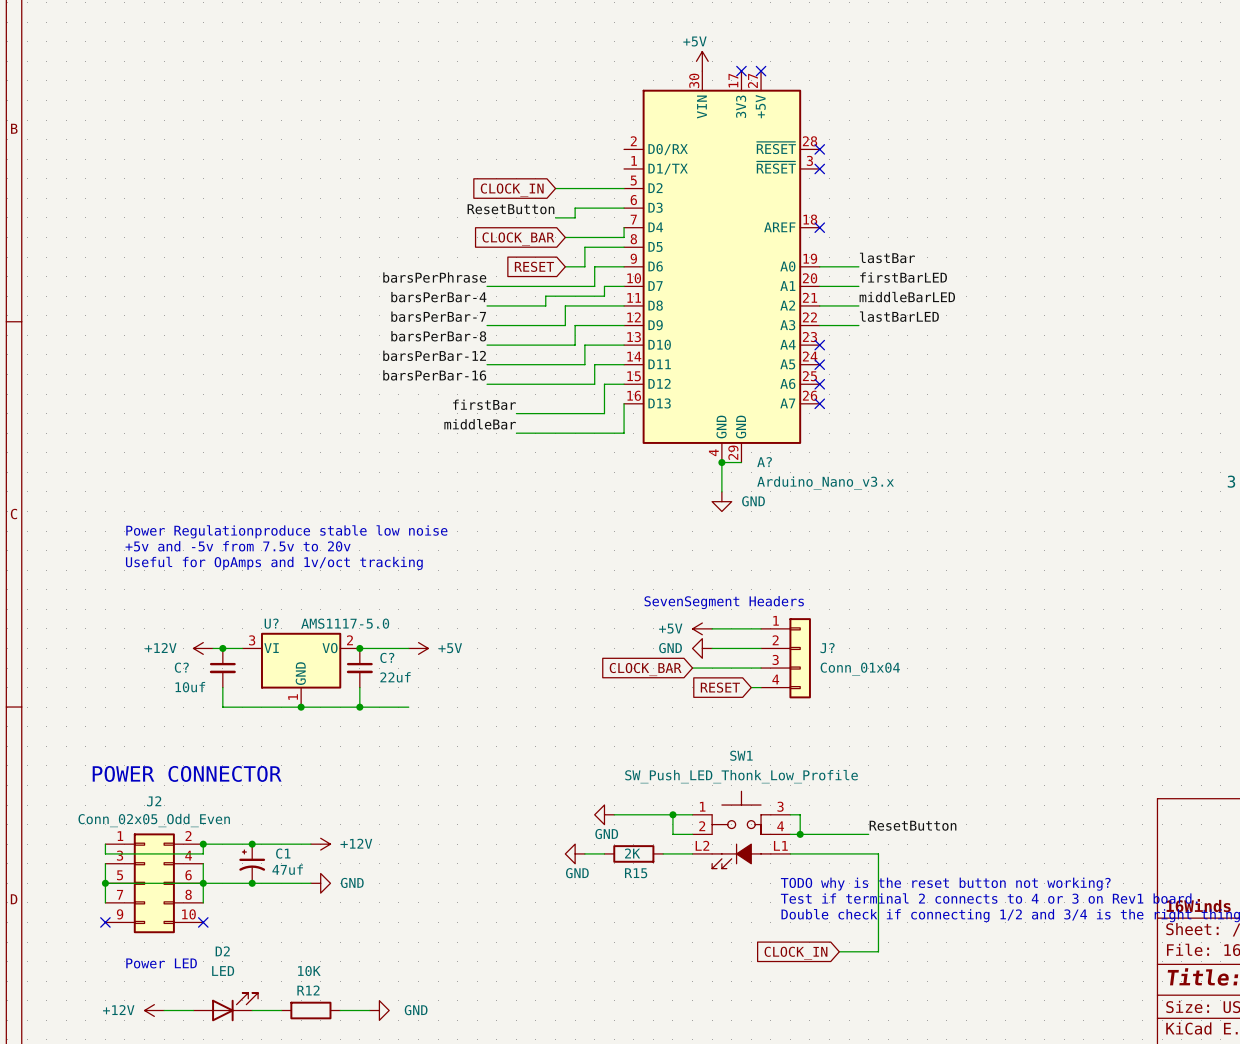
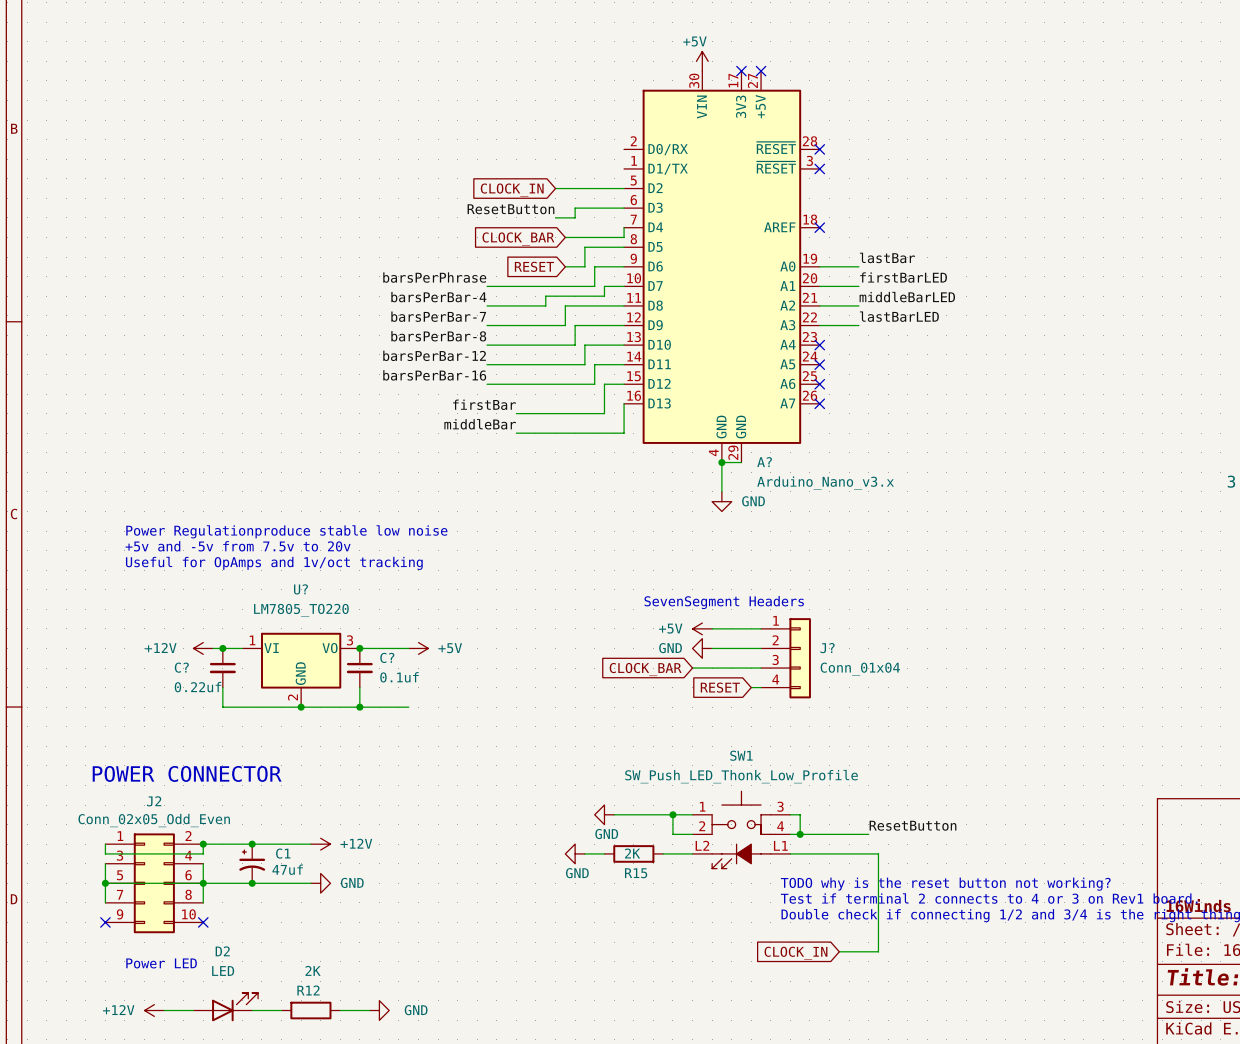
U? name position: U? (271, 623) -> U? (300, 589)
U? value: AMS1117-5.0 (345, 623) -> LM7805_TO220 (301, 610)
U? pin number: 3 (252, 640) -> 1 (252, 640)
U? pin number: 2 (349, 640) -> 3 (350, 640)
C? value: 22uf (395, 677) -> 0.1uf (399, 677)
C? value: 10uf (190, 687) -> 0.22uf (198, 687)
U? pin number: 1 (293, 697) -> 2 (292, 697)
R12 value: 10K (309, 971) -> 2K (313, 970)

